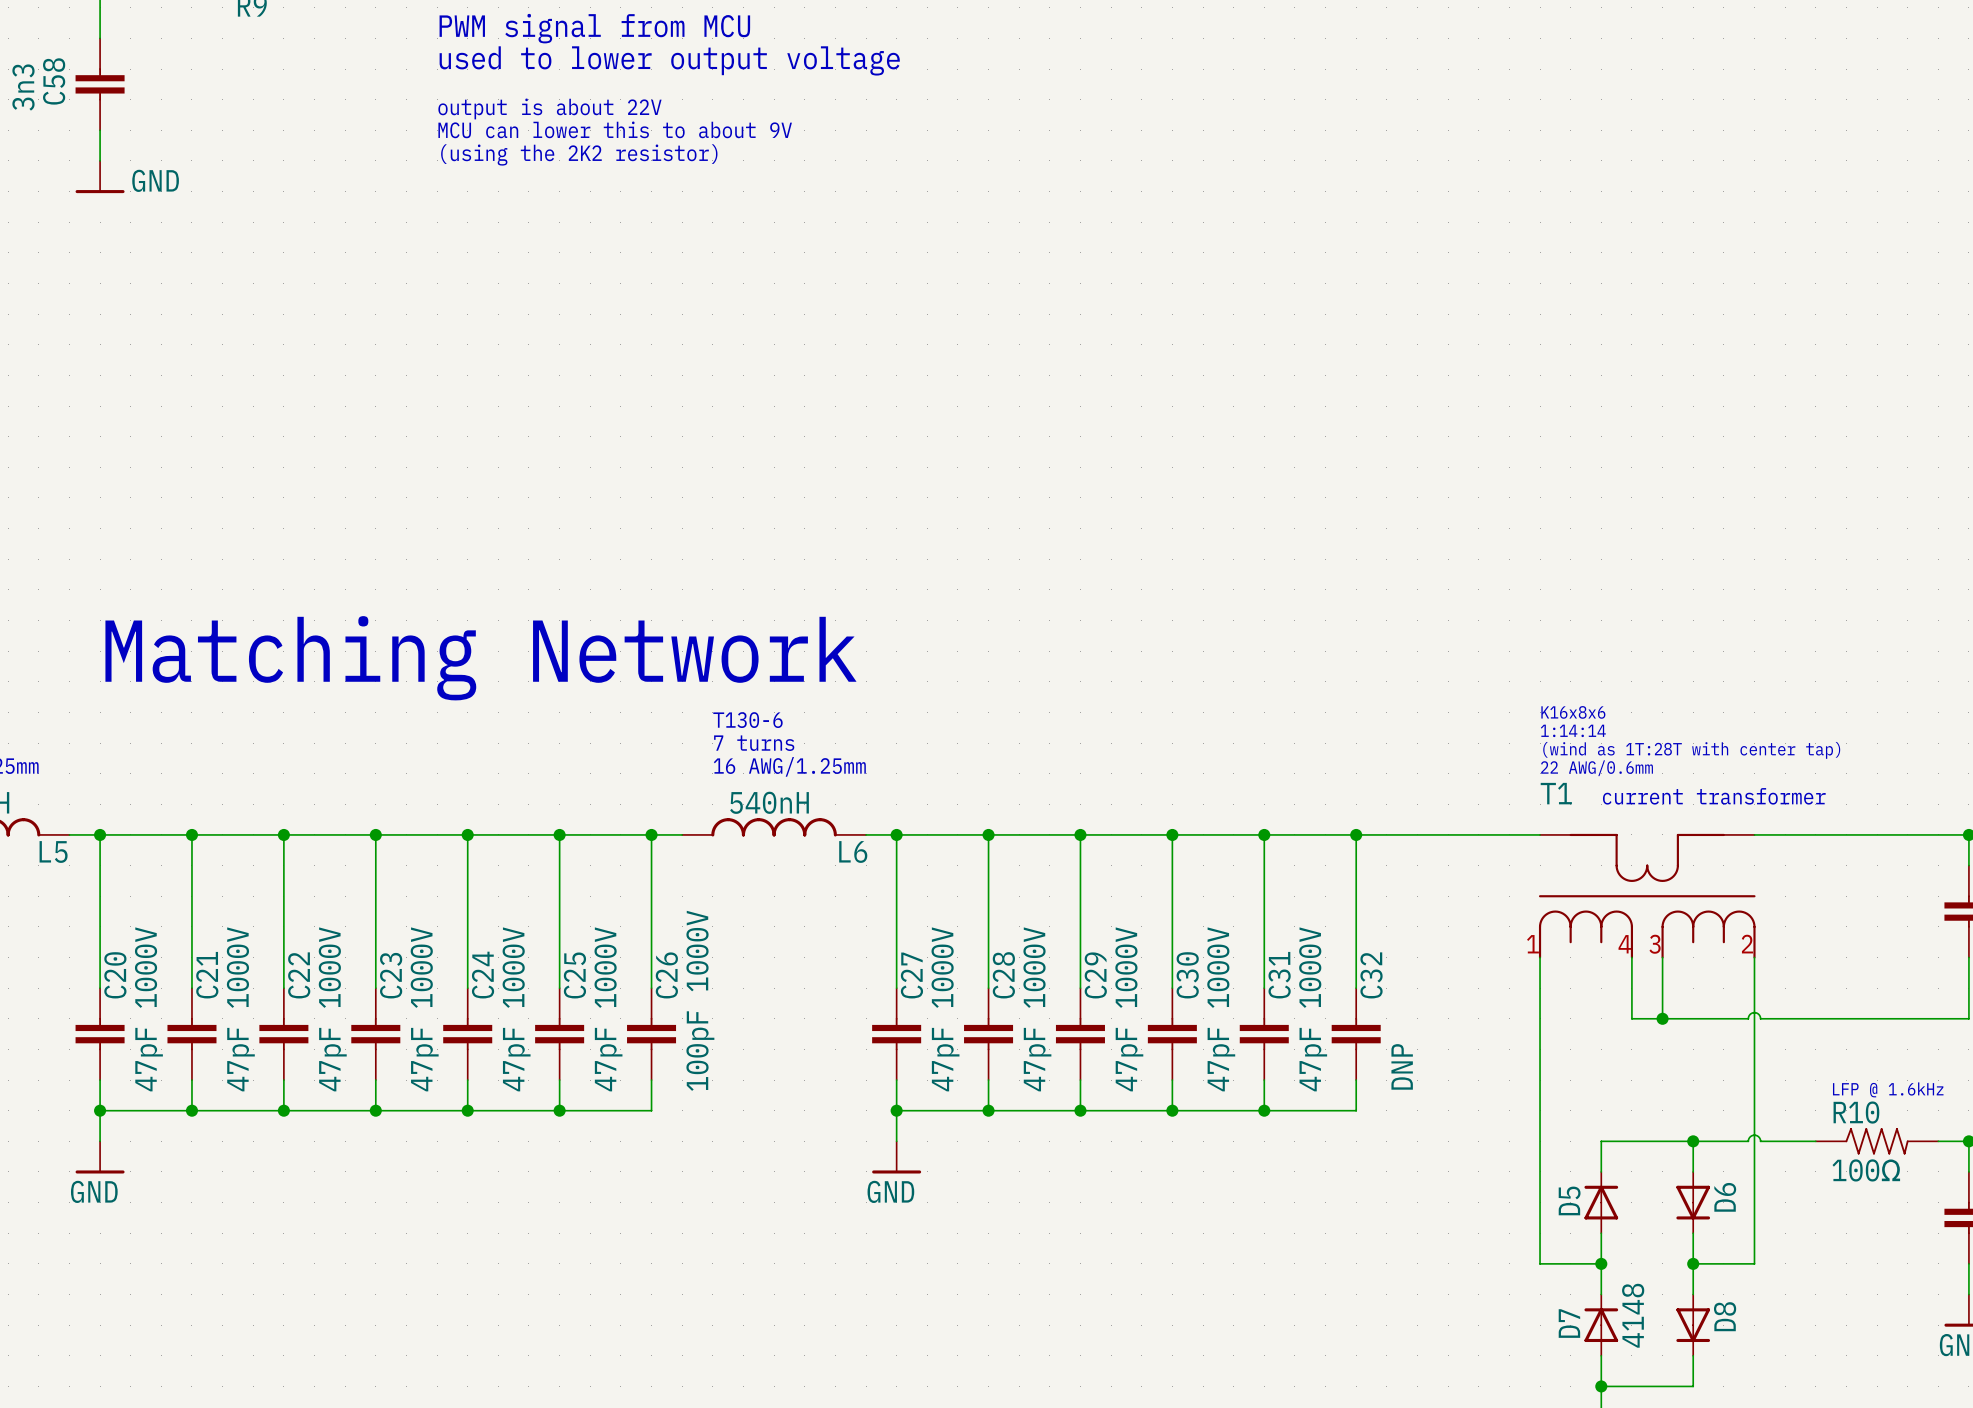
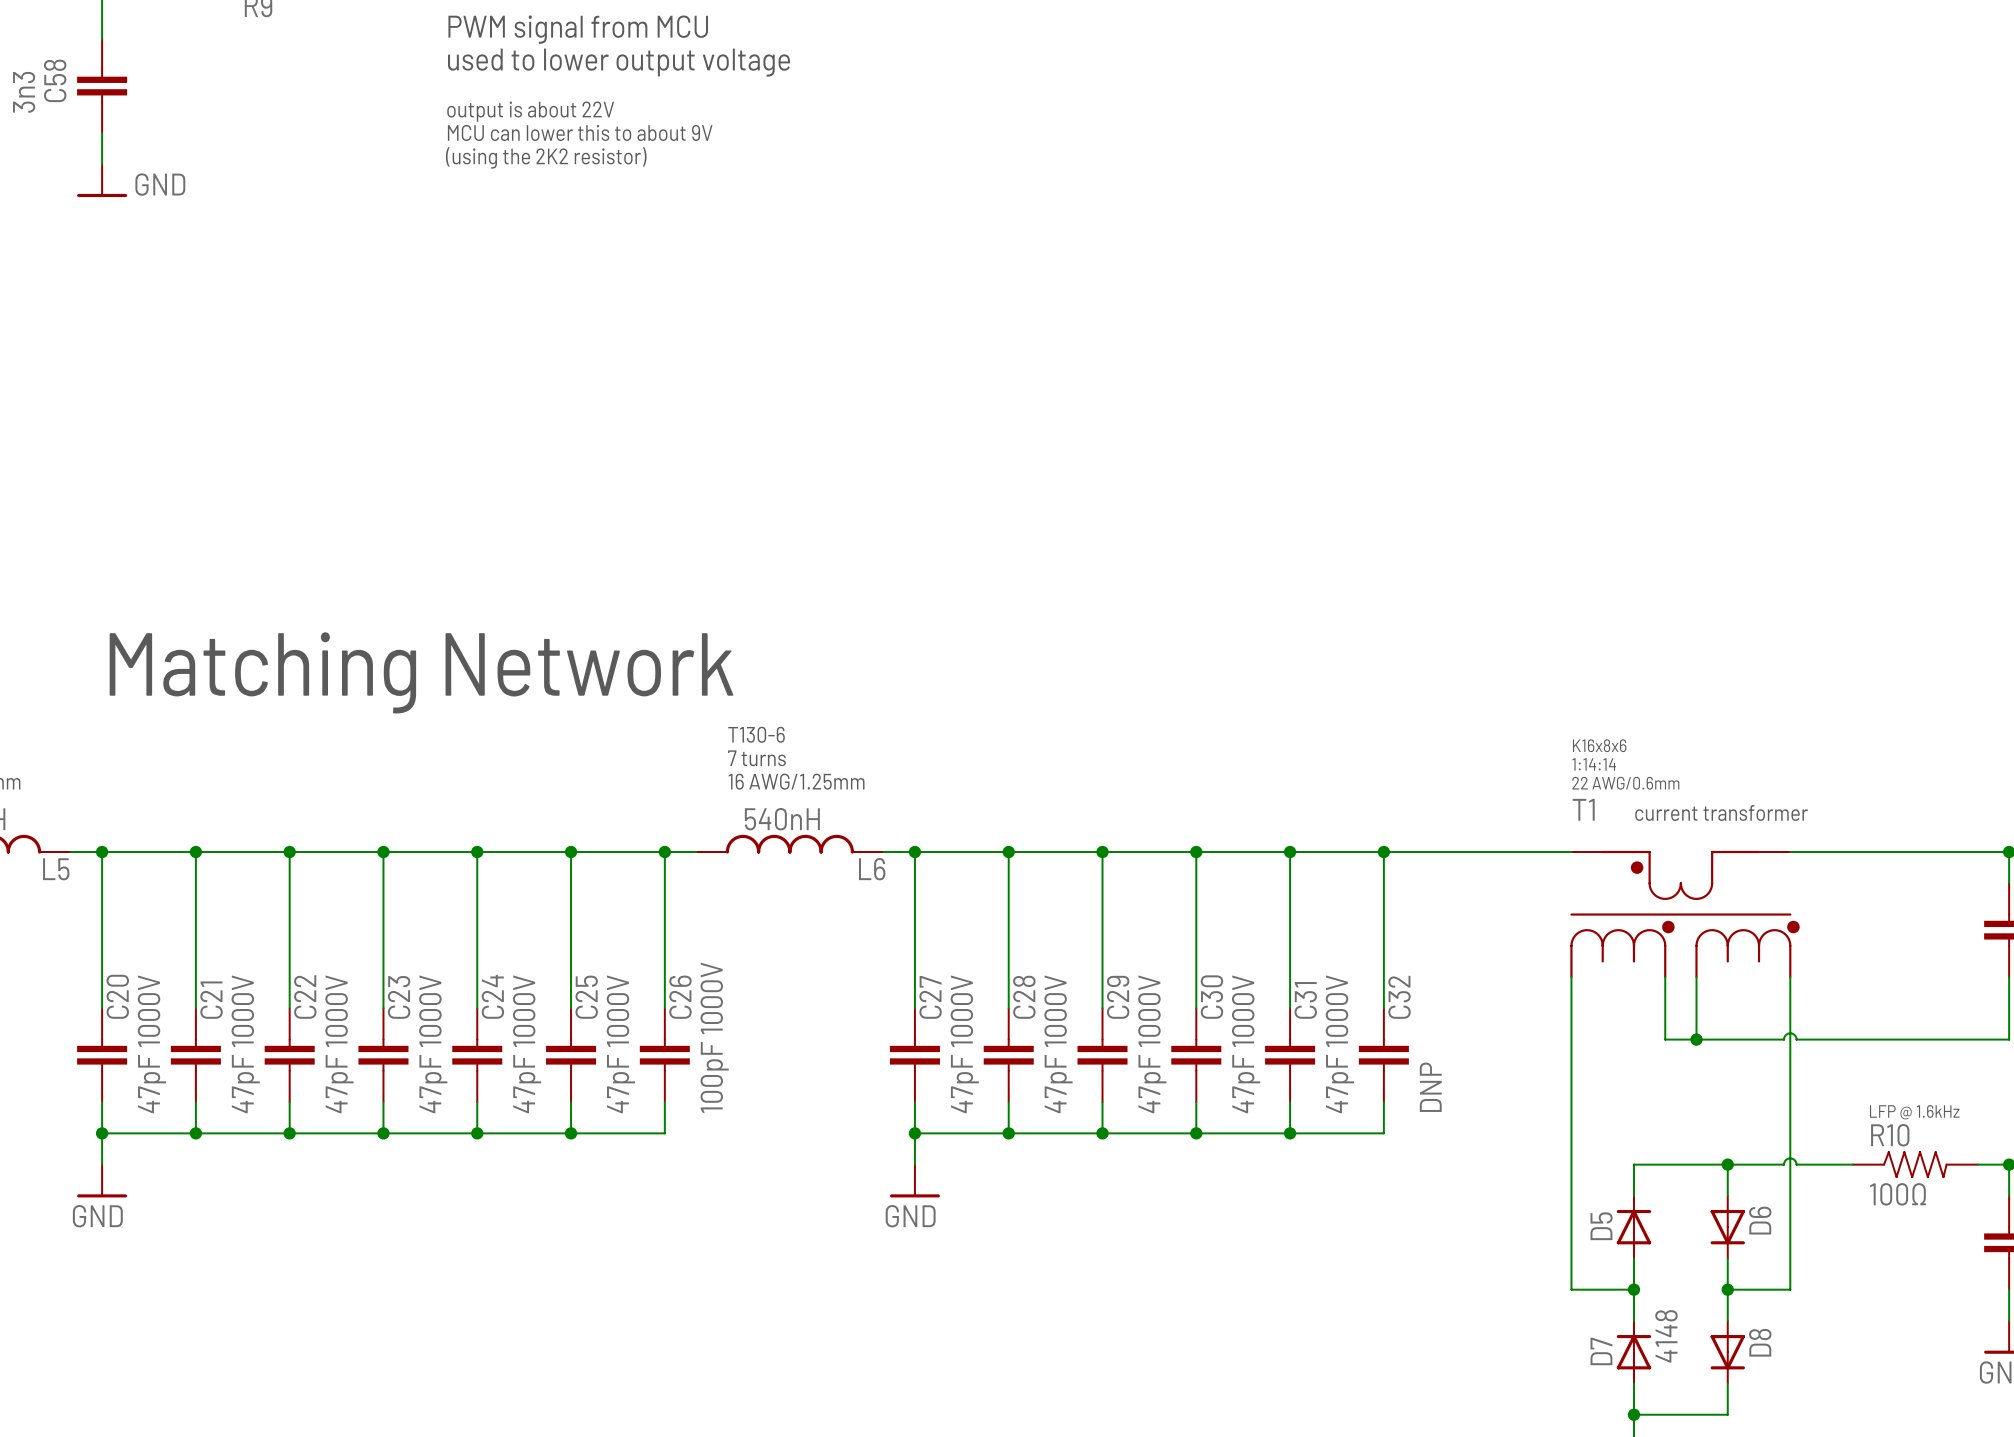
text: K16x8x6 (1573, 712) -> none
text: 1:14:14 (1573, 730) -> K16x8x6 (1599, 745)
text: (wind as 1T:28T with center tap) (1691, 750) -> 1:14:14 (1594, 764)
T1 symbol: [1538, 833, 1756, 959] -> [1570, 850, 1800, 979]

